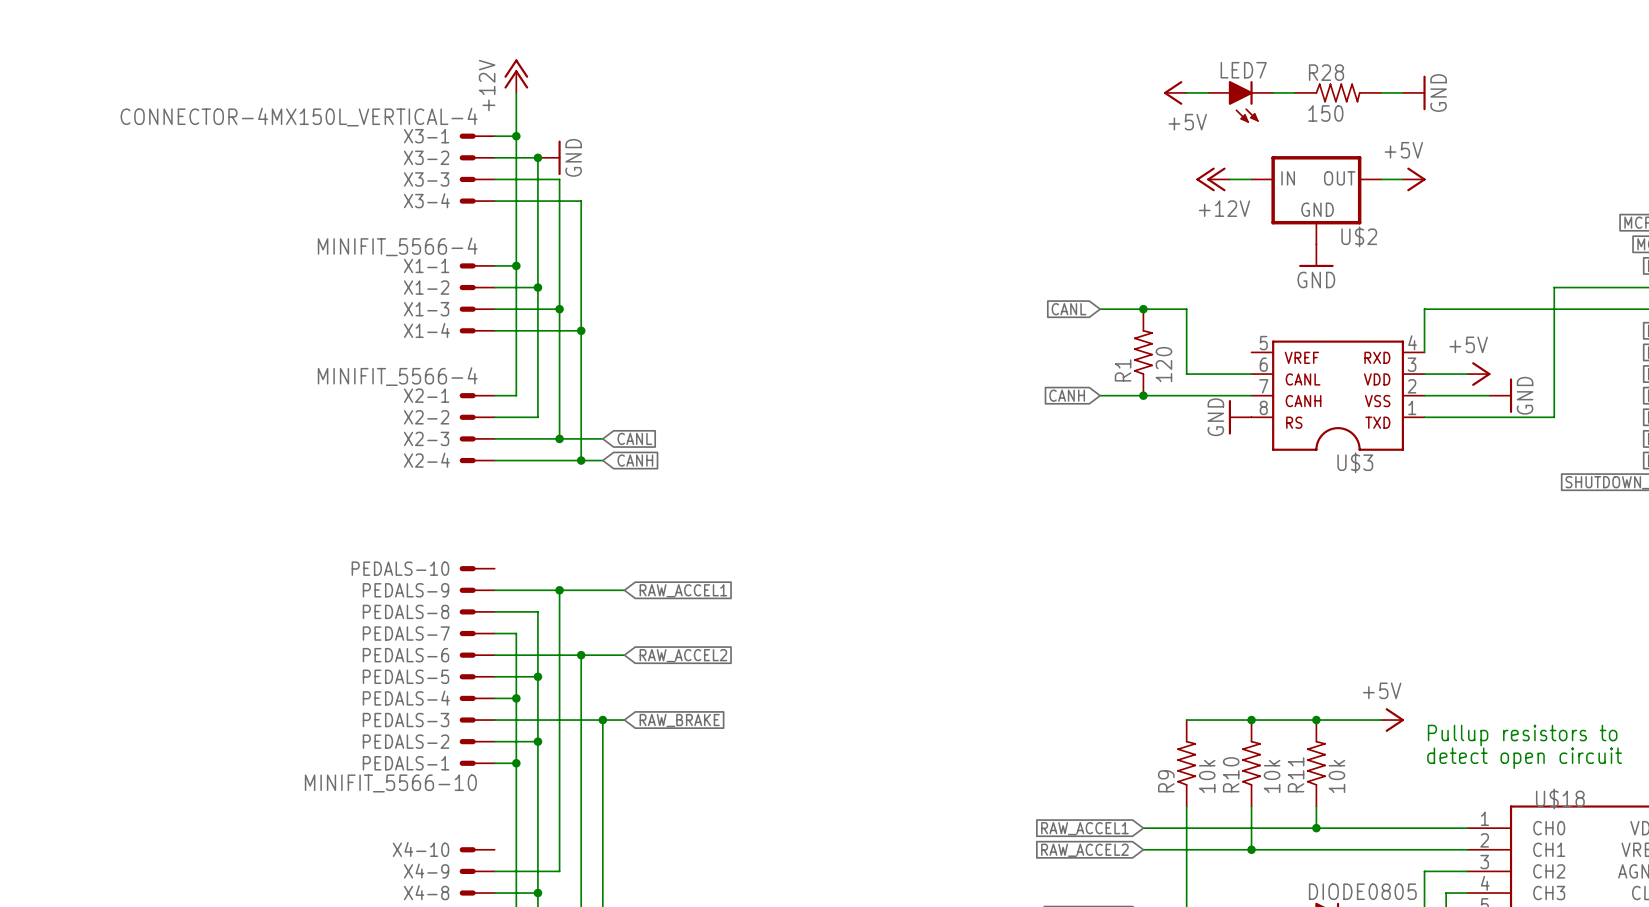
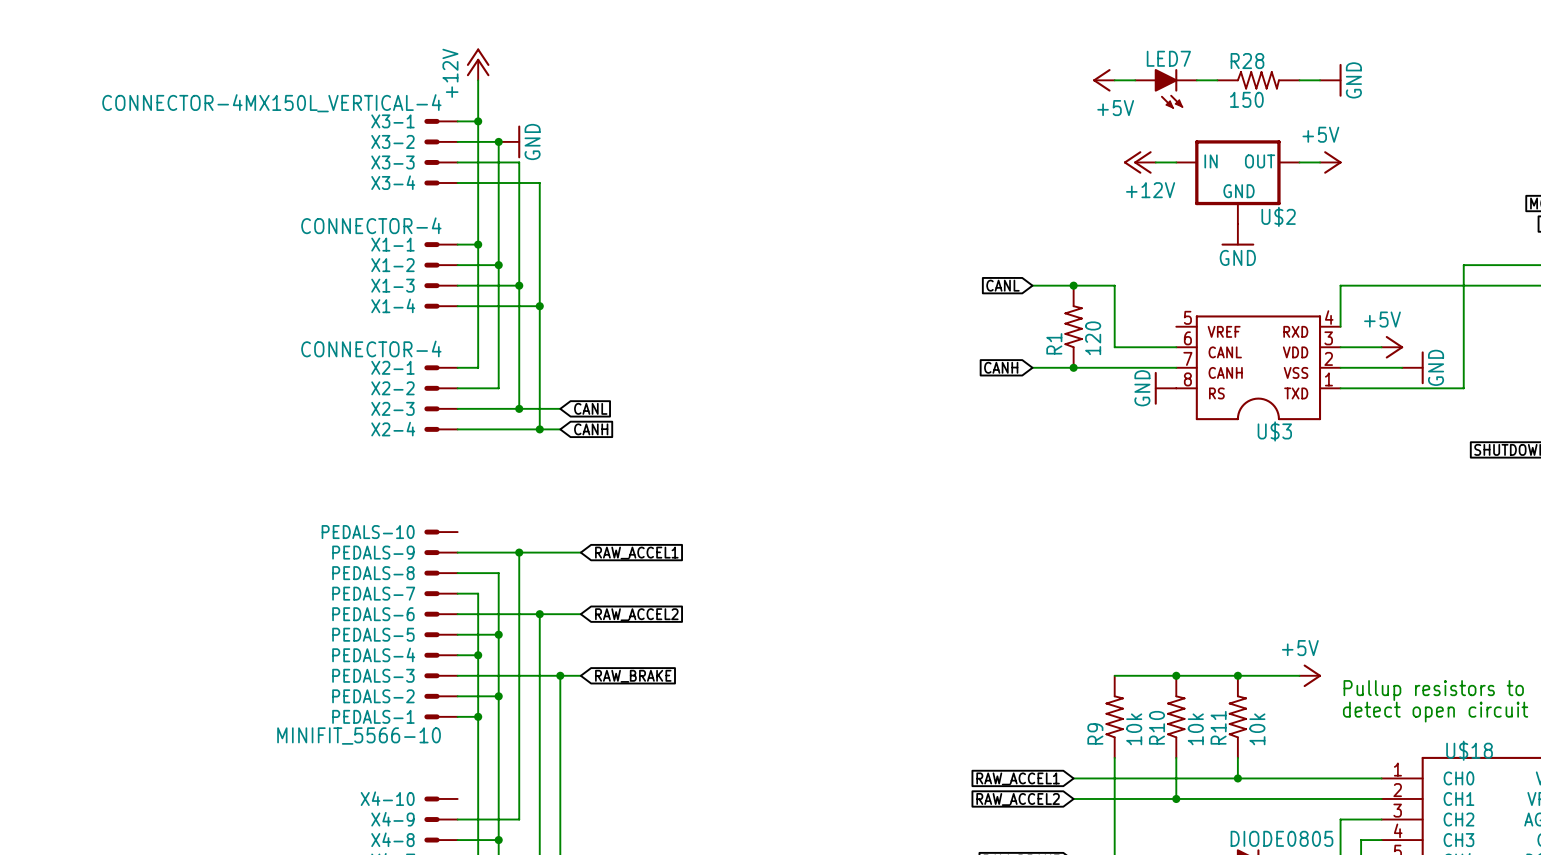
X1-1 value: MINIFIT_5566-4 (397, 246) -> CONNECTOR-4 (371, 225)
X2-1 value: MINIFIT_5566-4 (397, 376) -> CONNECTOR-4 (371, 348)

